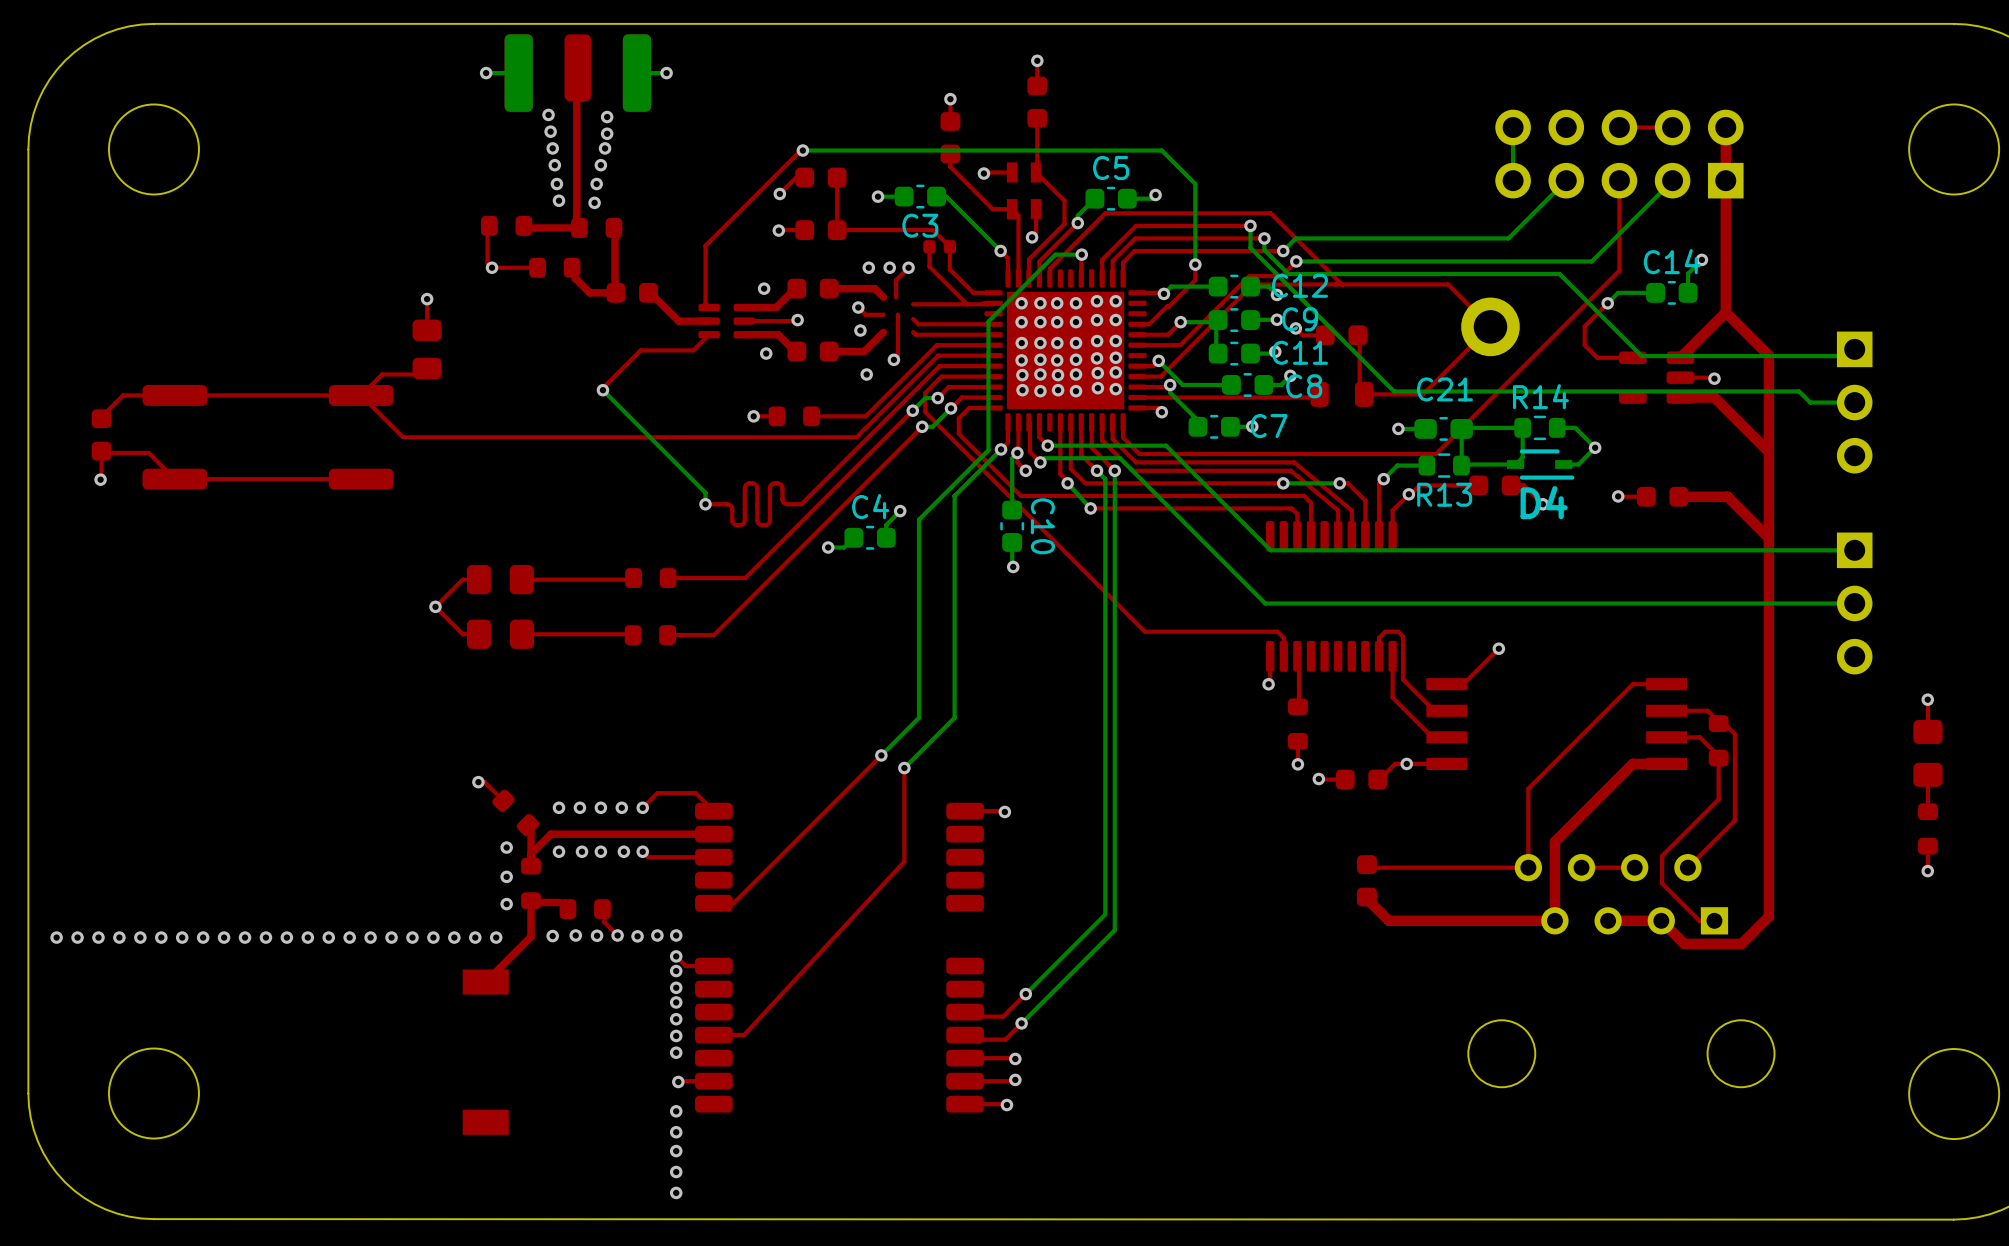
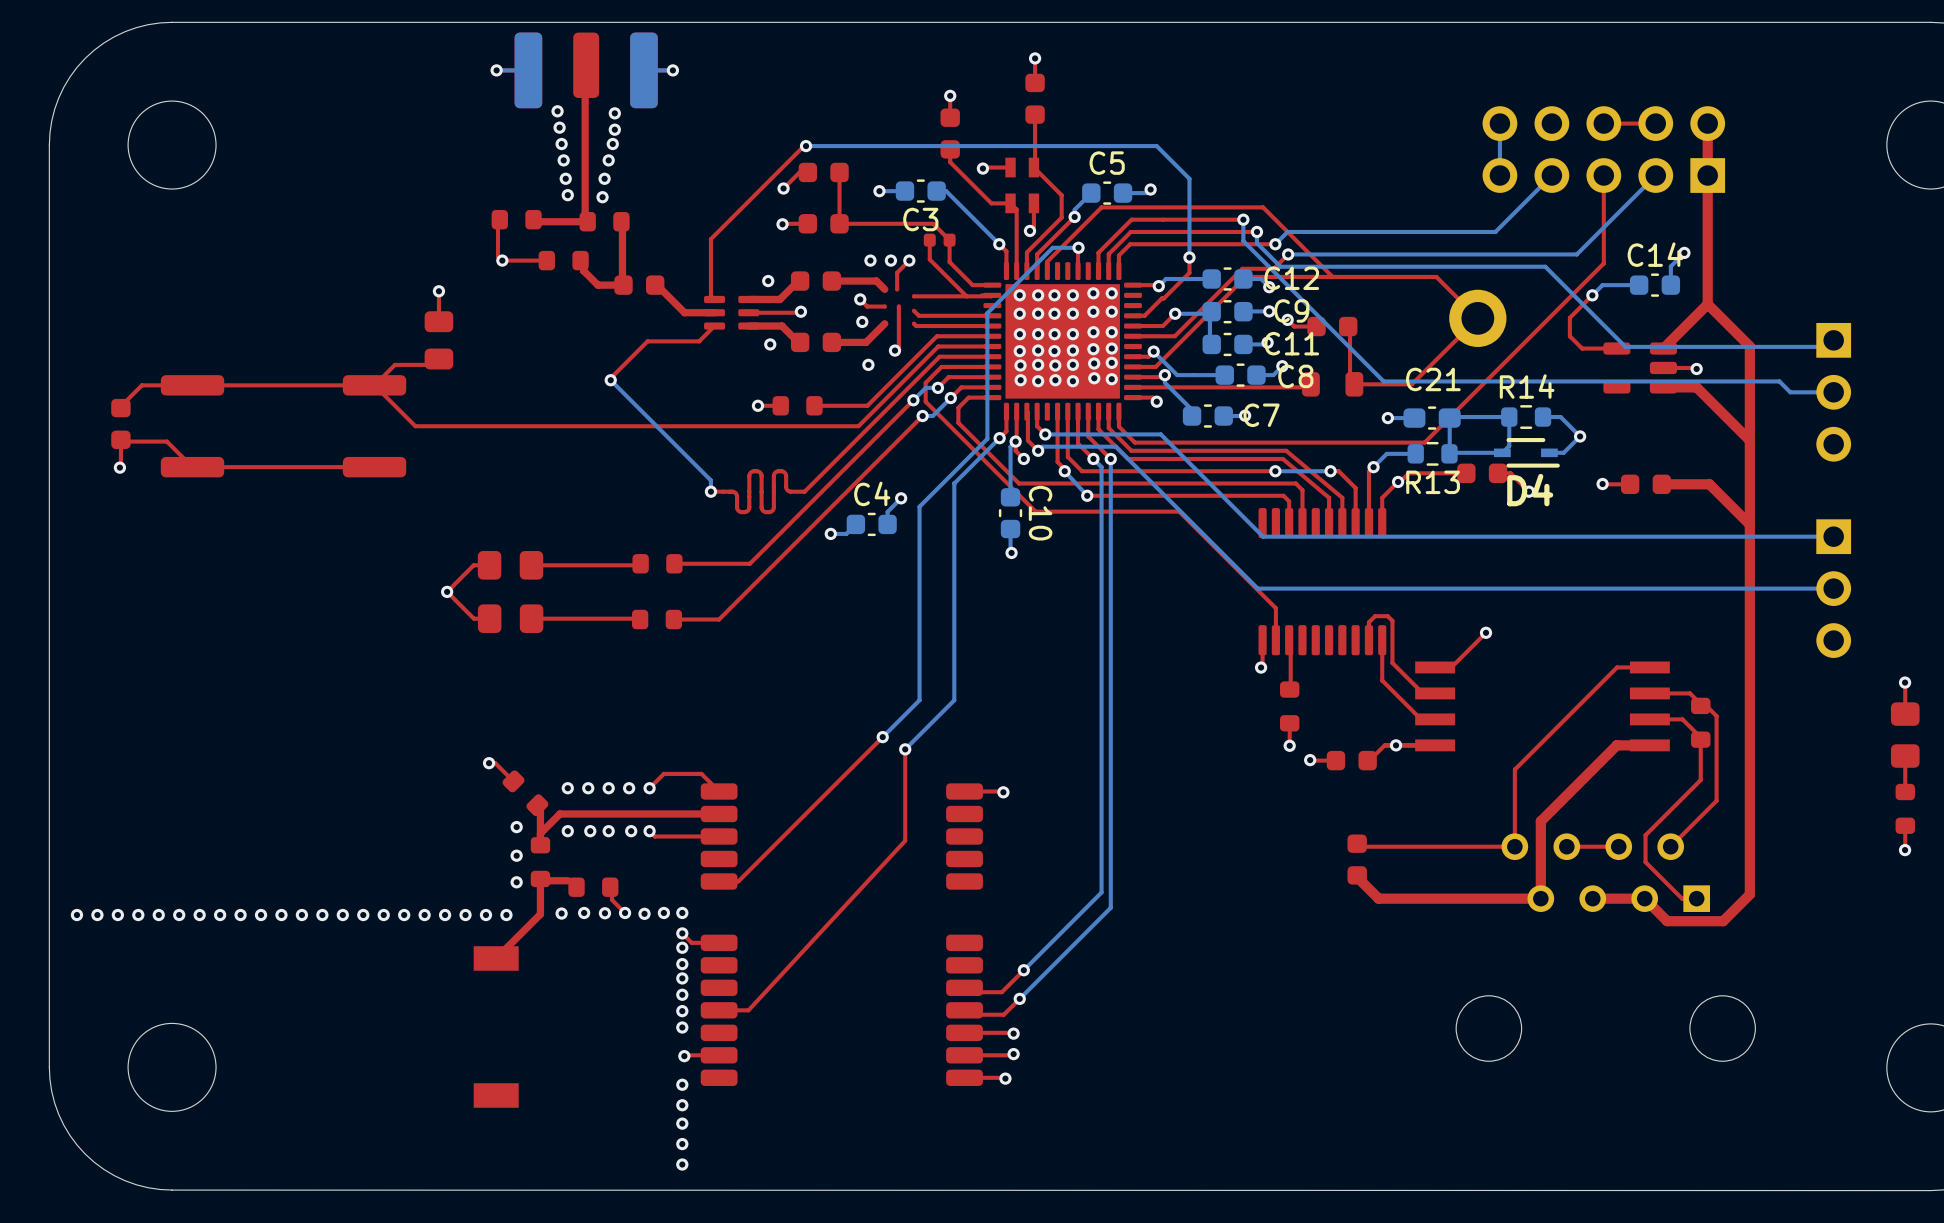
top track: (1037, 524) (1144, 631) (1277, 631) (1283, 637) -> (1035, 511) (1179, 511) (1275, 608) (1275, 622)

